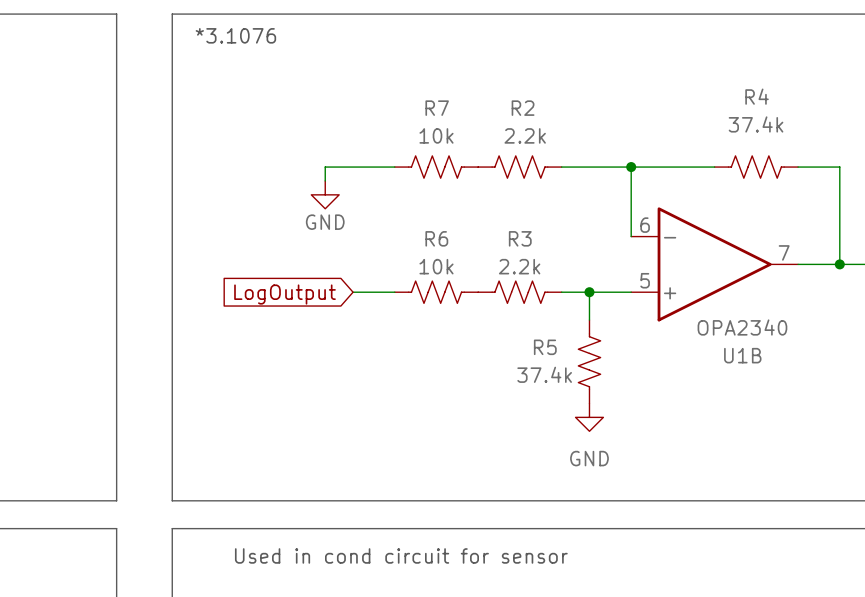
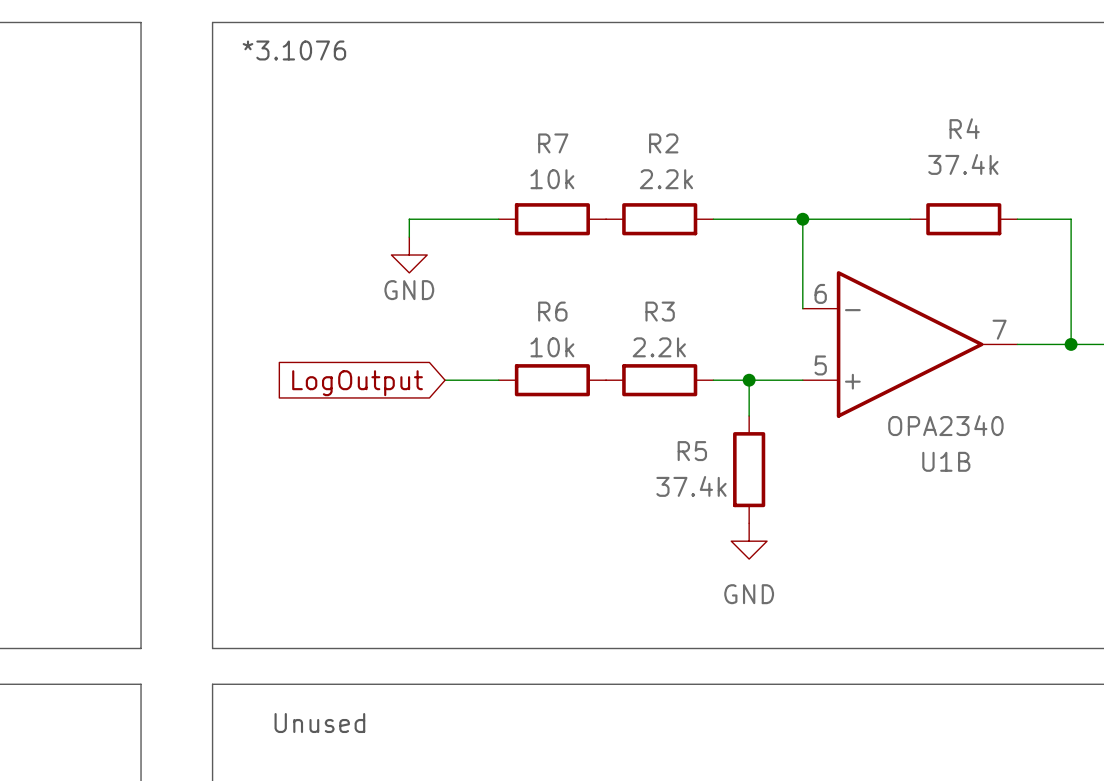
R7 symbol: [394, 155, 479, 179] -> [498, 203, 607, 236]
R2 symbol: [478, 155, 562, 179] -> [606, 203, 714, 236]
R4 symbol: [714, 155, 799, 179] -> [910, 203, 1018, 236]
R6 symbol: [394, 281, 479, 304] -> [498, 364, 607, 397]
R3 symbol: [478, 281, 562, 304] -> [606, 364, 714, 397]
R5 symbol: [578, 320, 601, 404] -> [733, 415, 766, 524]
text: Used in cond circuit for sensor (401, 555) -> none
text: none -> Unused (319, 723)

